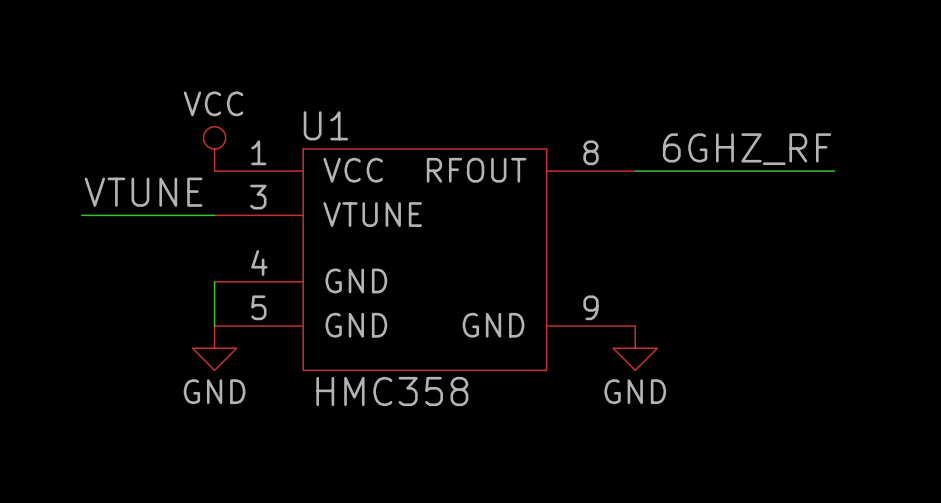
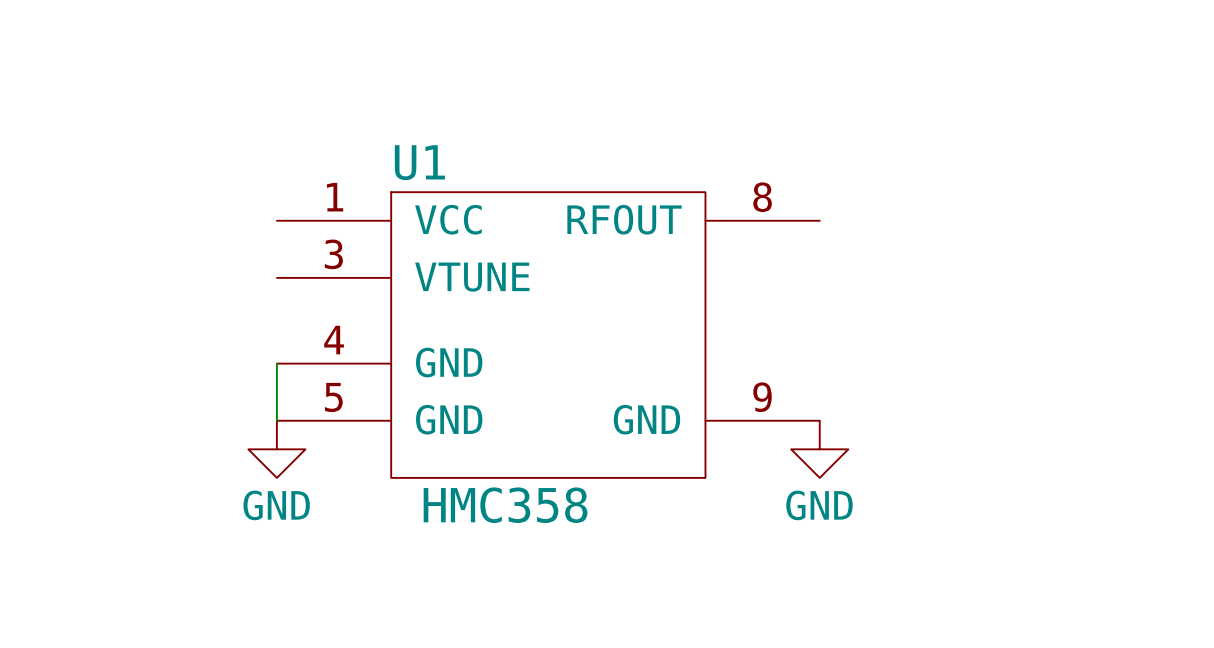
power symbol: VCC (214, 148) -> none
label: 6GHZ_RF (747, 149) -> none
wire: (635, 171) (834, 171) -> none
label: VTUNE (143, 192) -> none
wire: (81, 215) (214, 215) -> none

